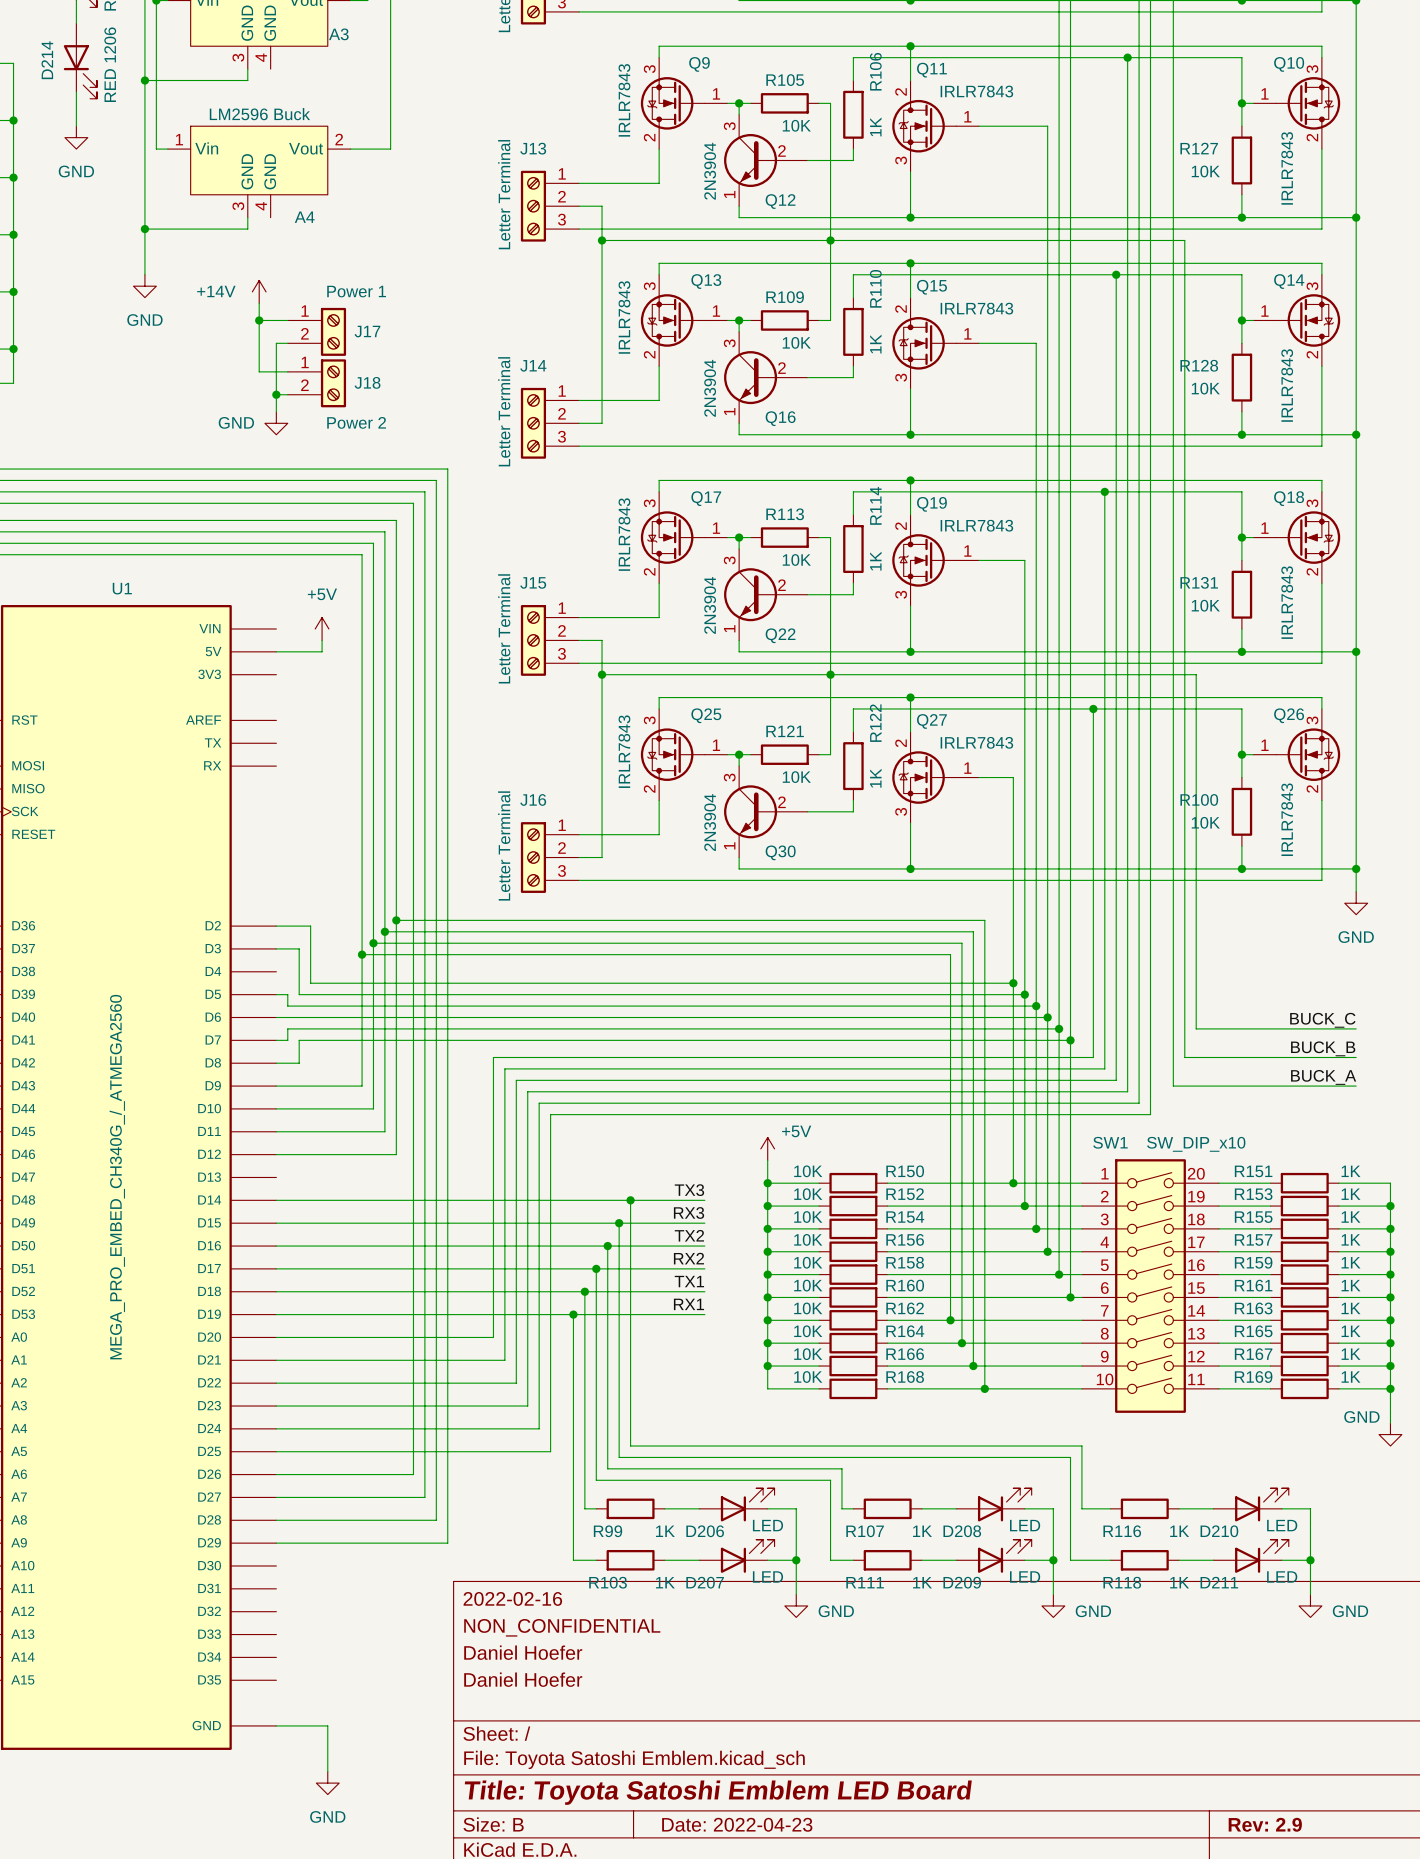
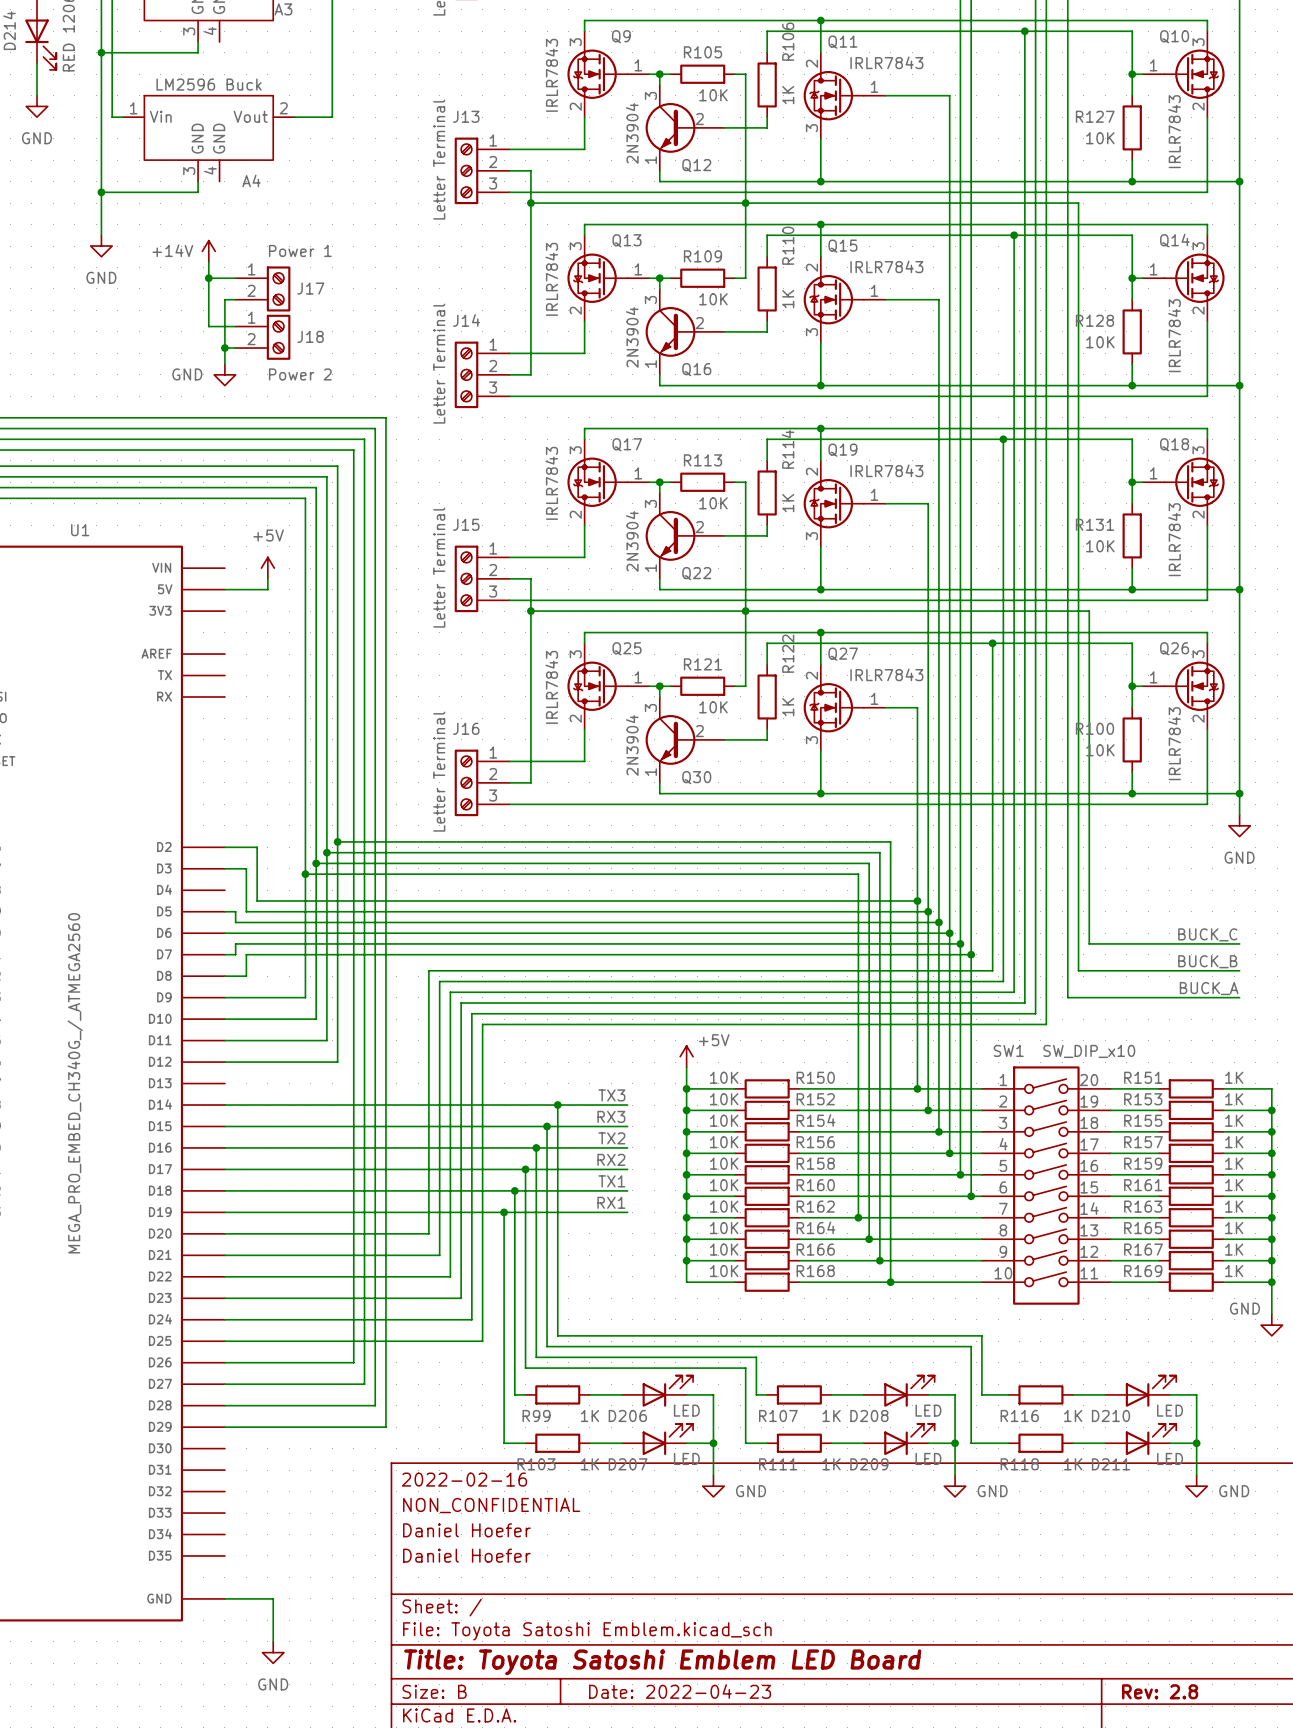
title block: Rev: 2.9 (1265, 1824) -> Rev: 2.8 (1160, 1691)

